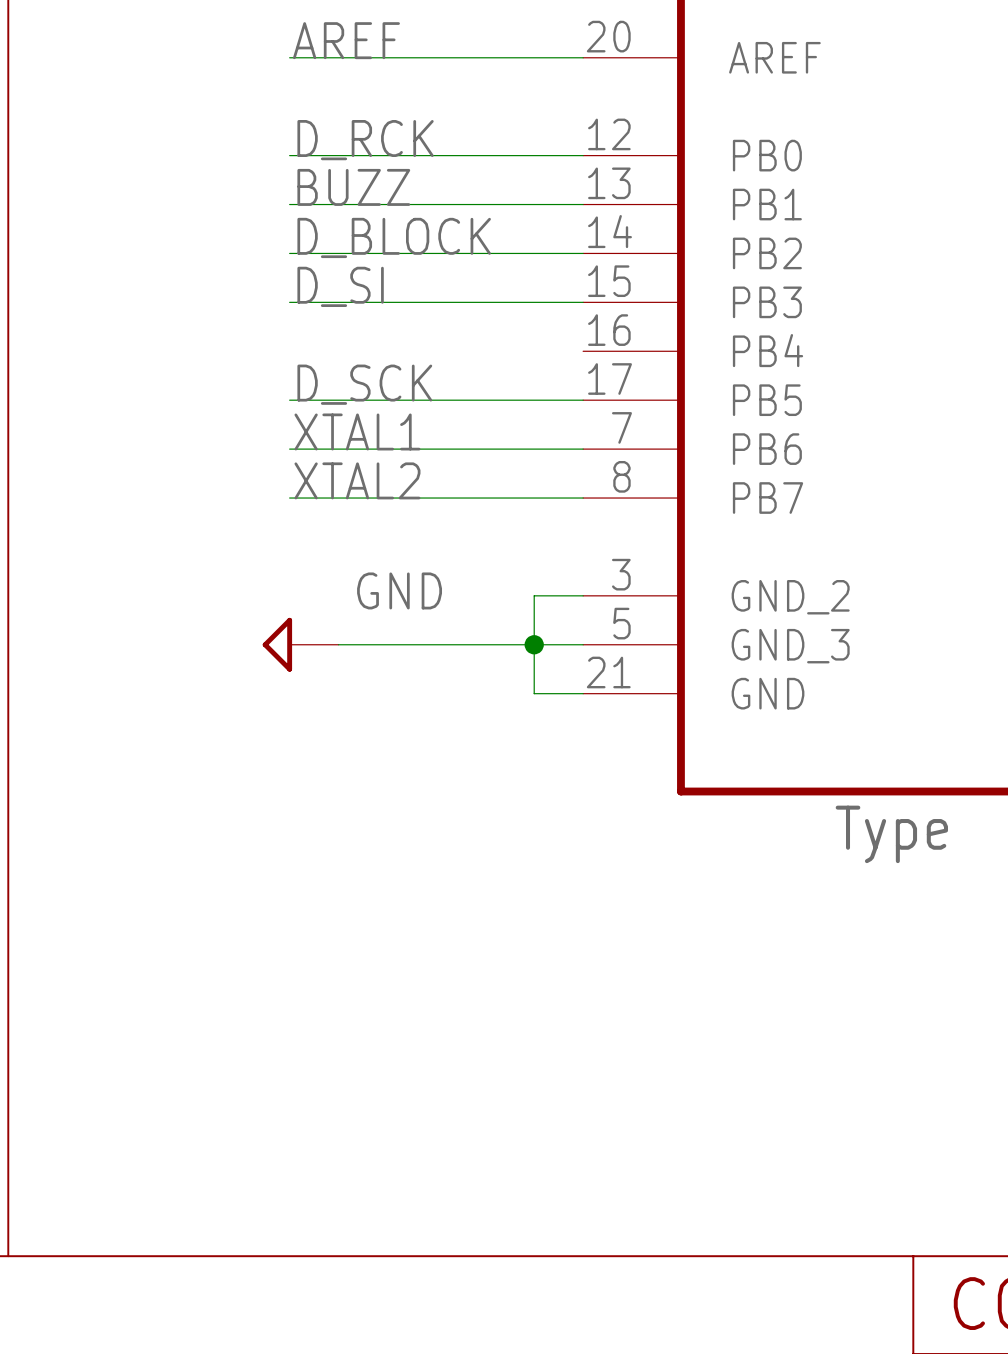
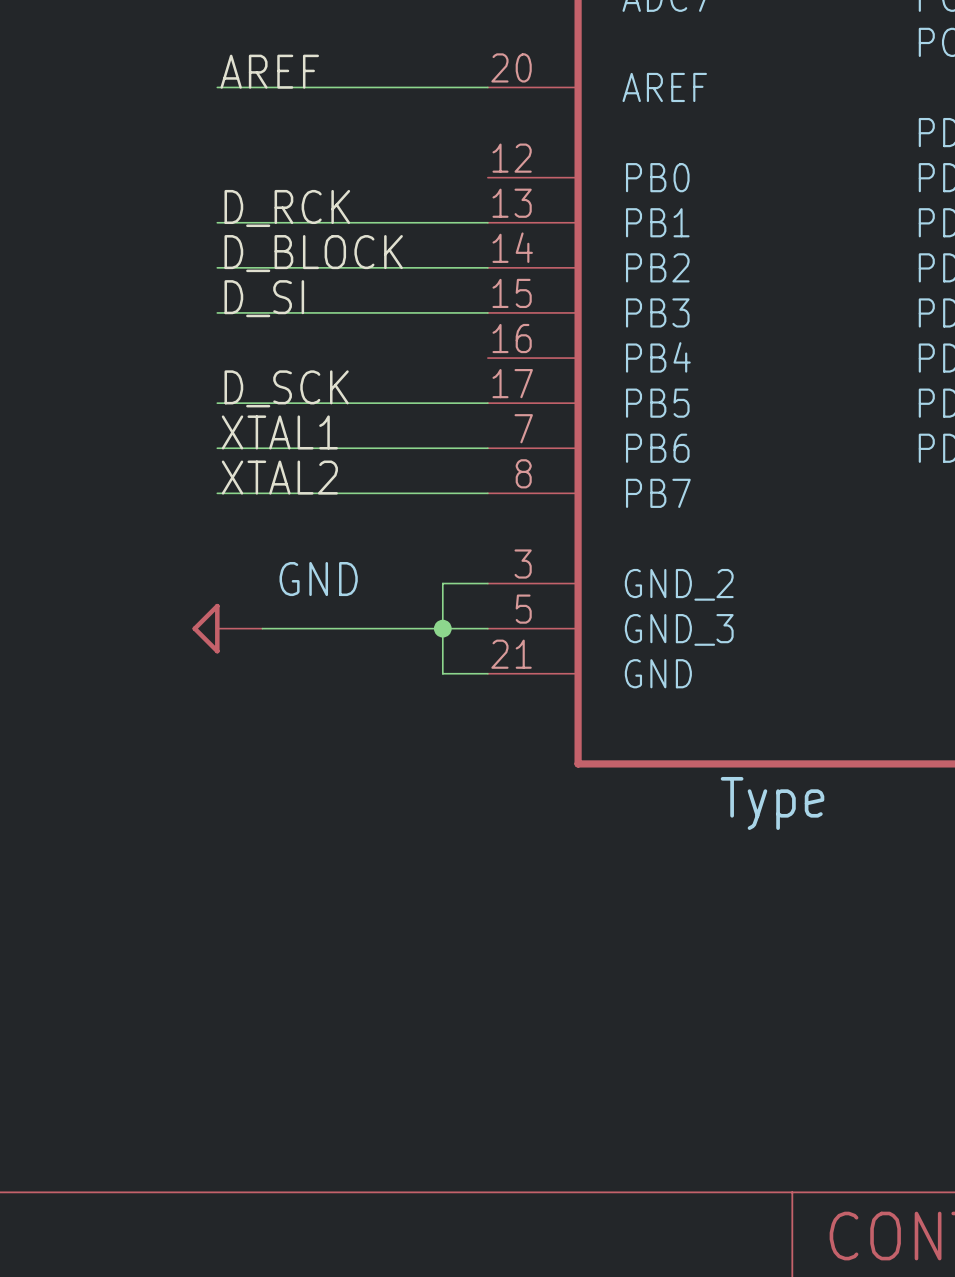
label: D_RCK (365, 140) -> none
wire: (289, 155) (583, 155) -> none
label: BUZZ (353, 187) -> D_RCK (287, 208)

